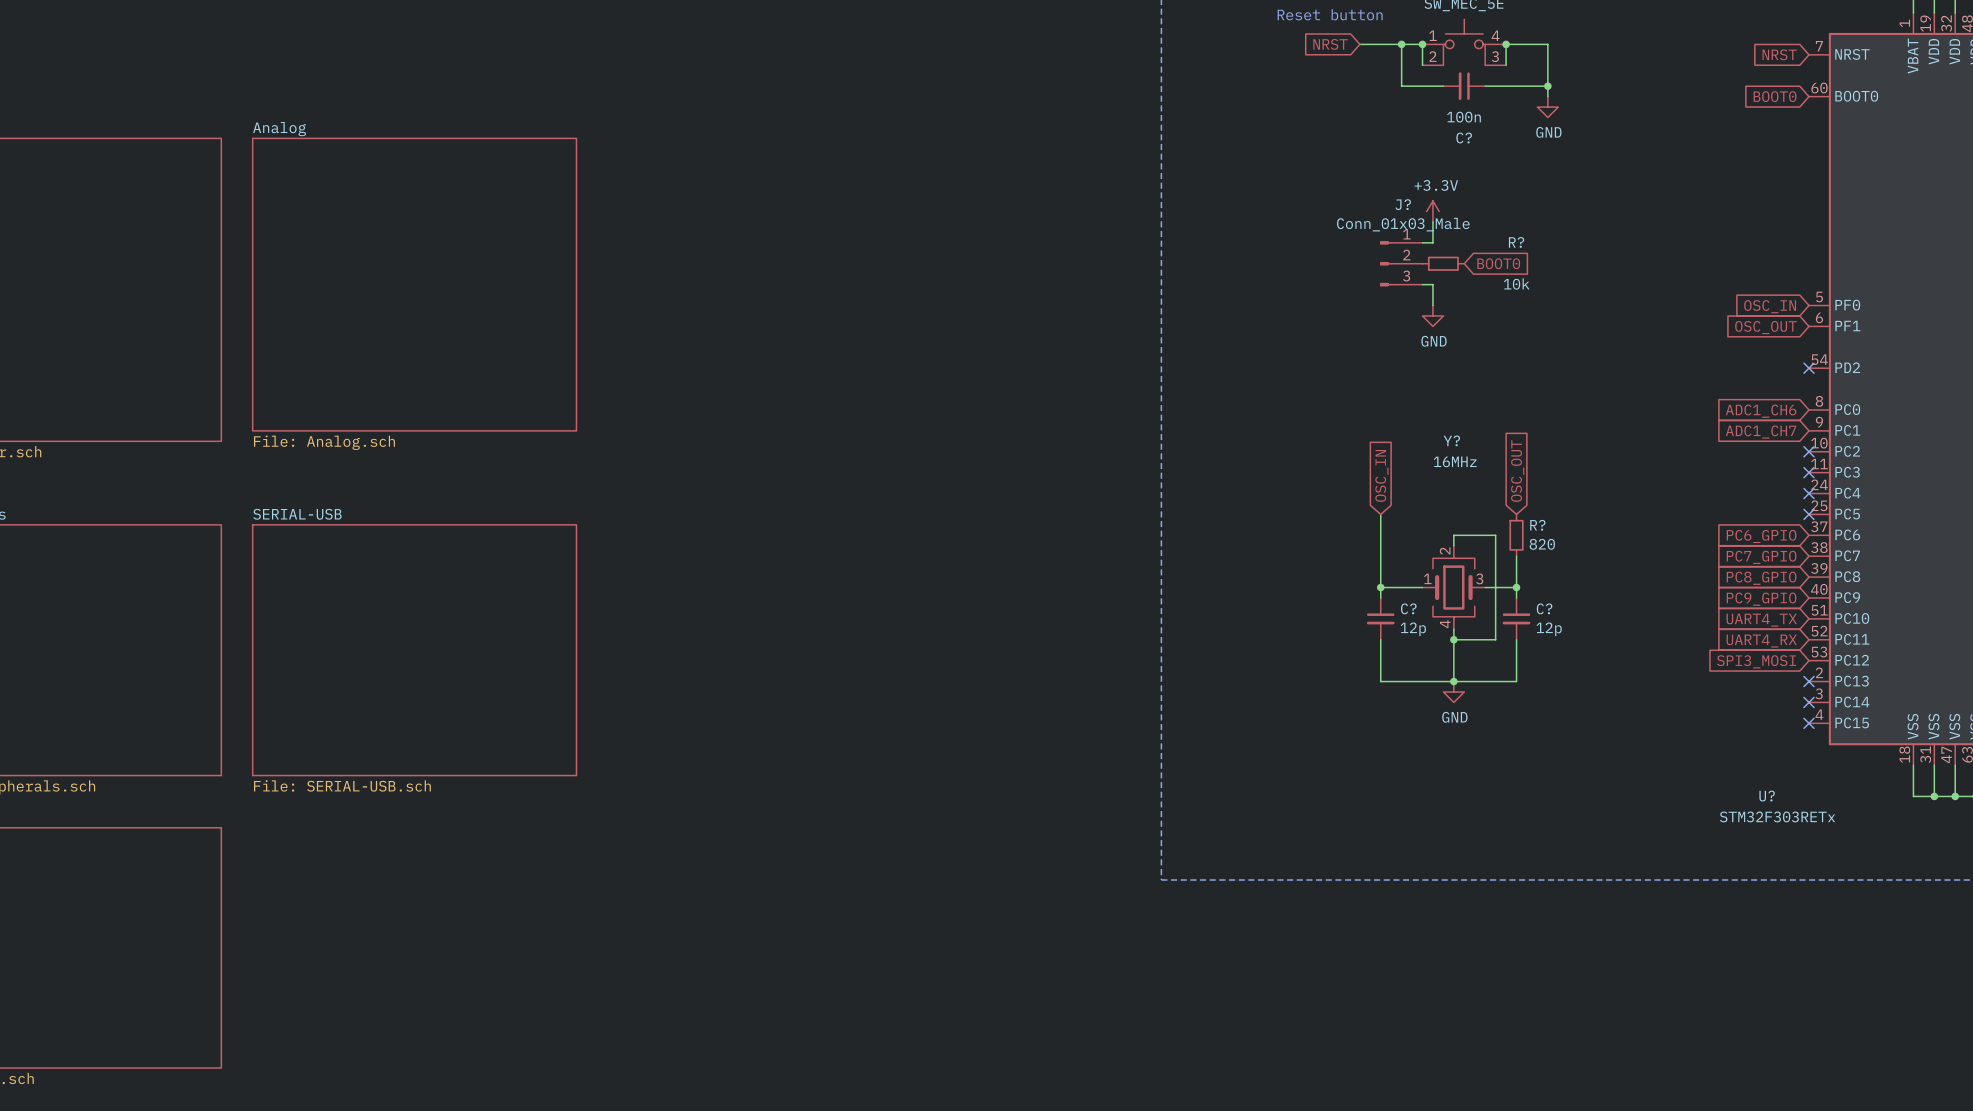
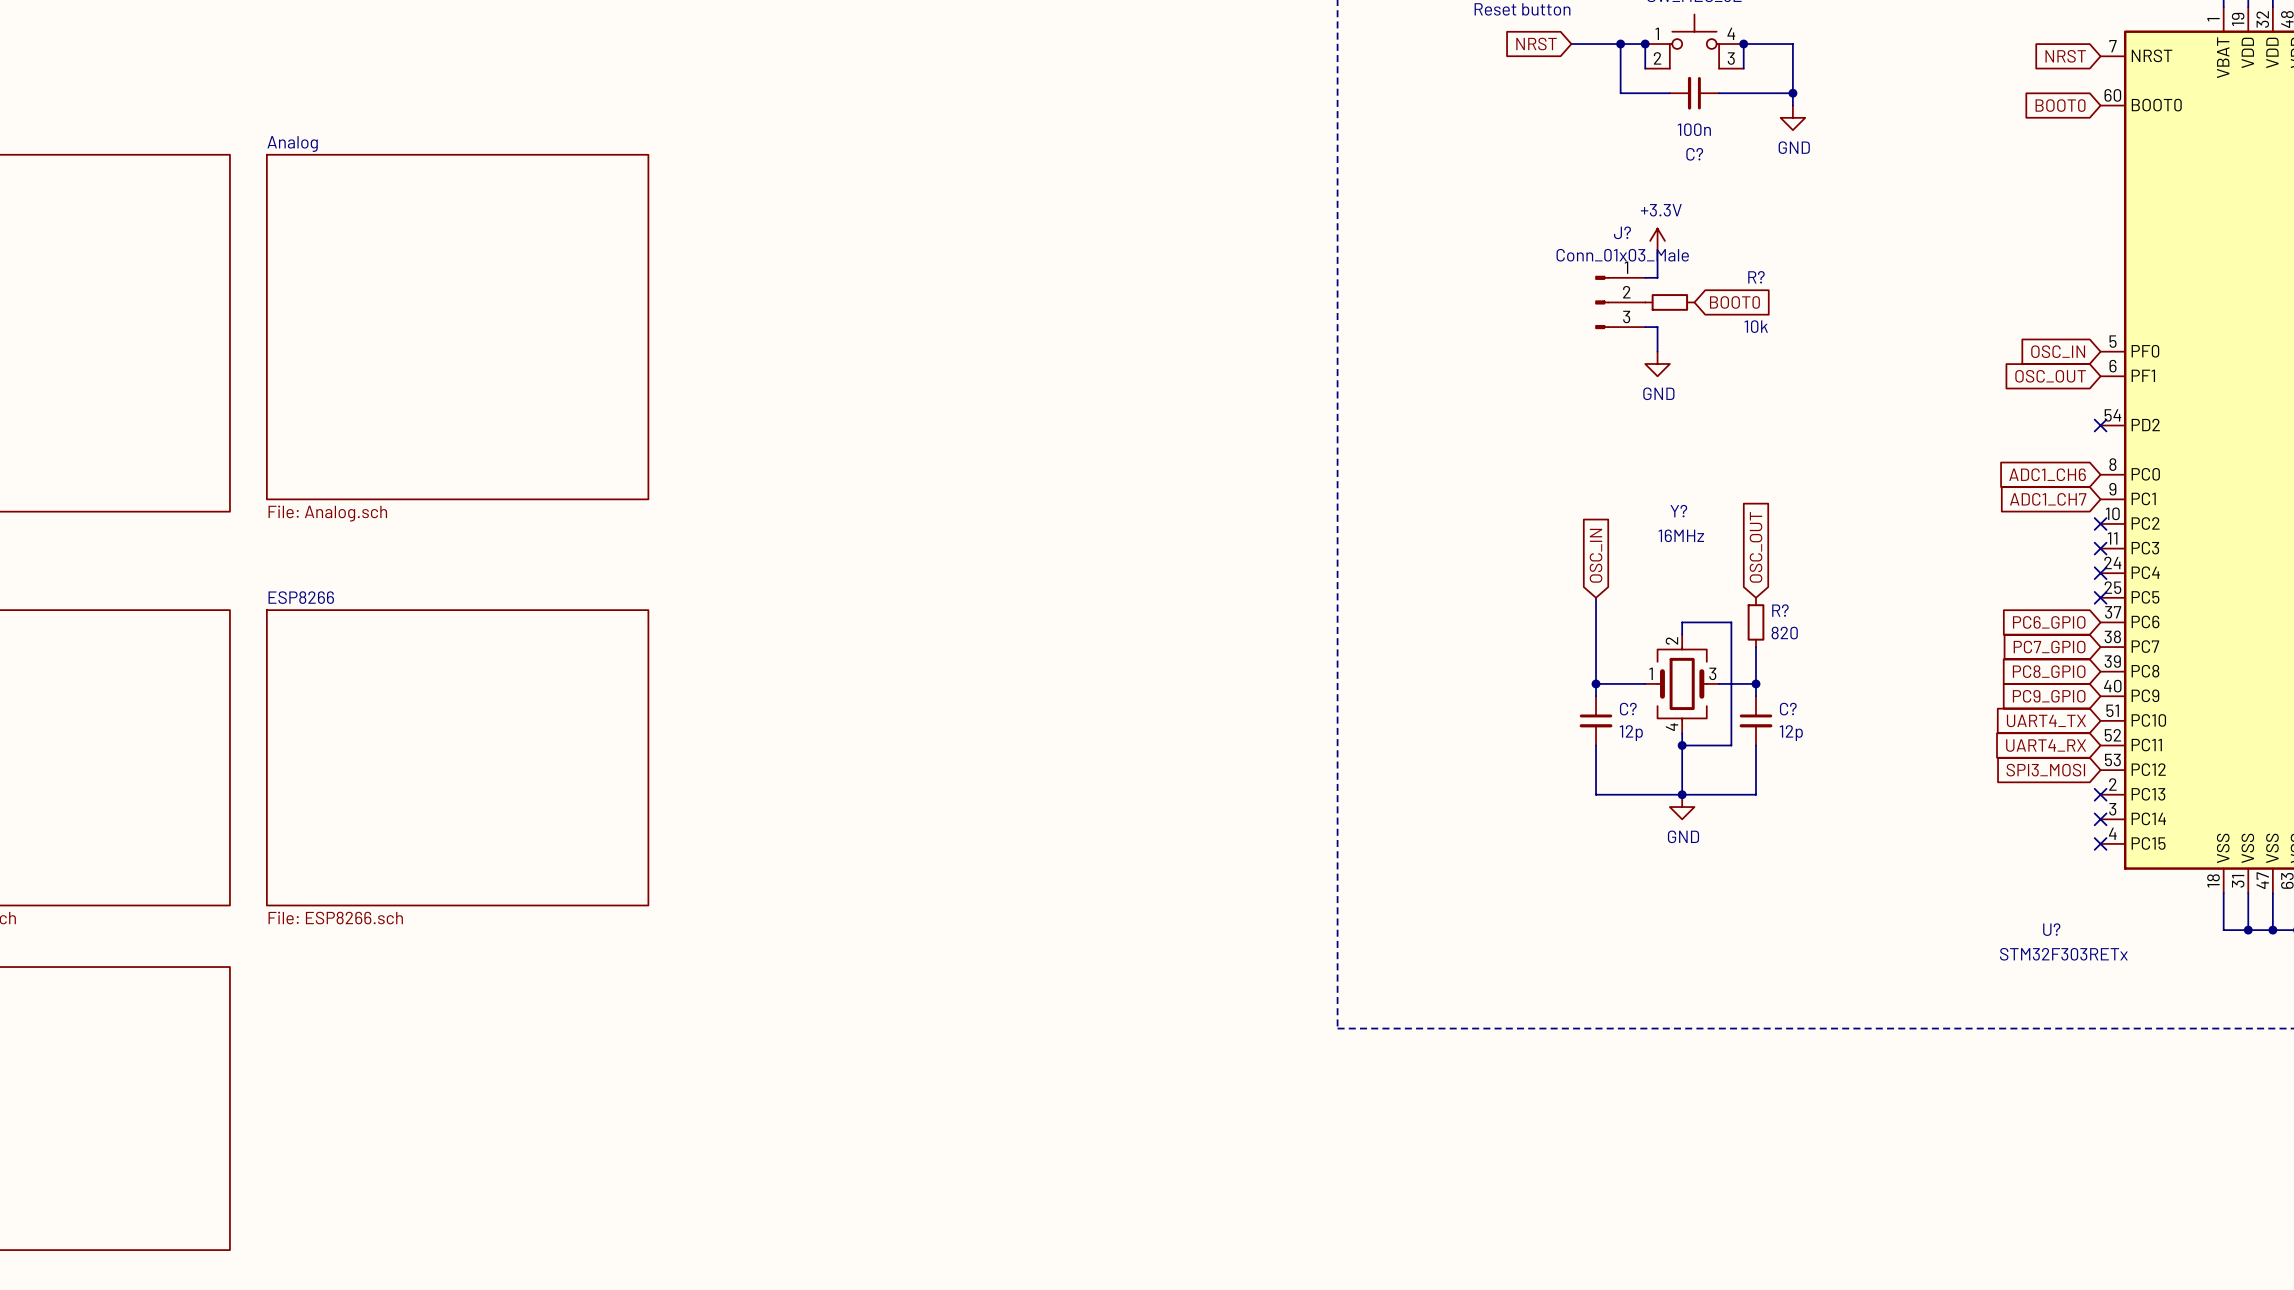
sheet SERIAL-USB name: SERIAL-USB (297, 514) -> ESP8266 (301, 597)
sheet SERIAL-USB value: File: SERIAL-USB.sch (342, 785) -> File: ESP8266.sch (335, 918)

